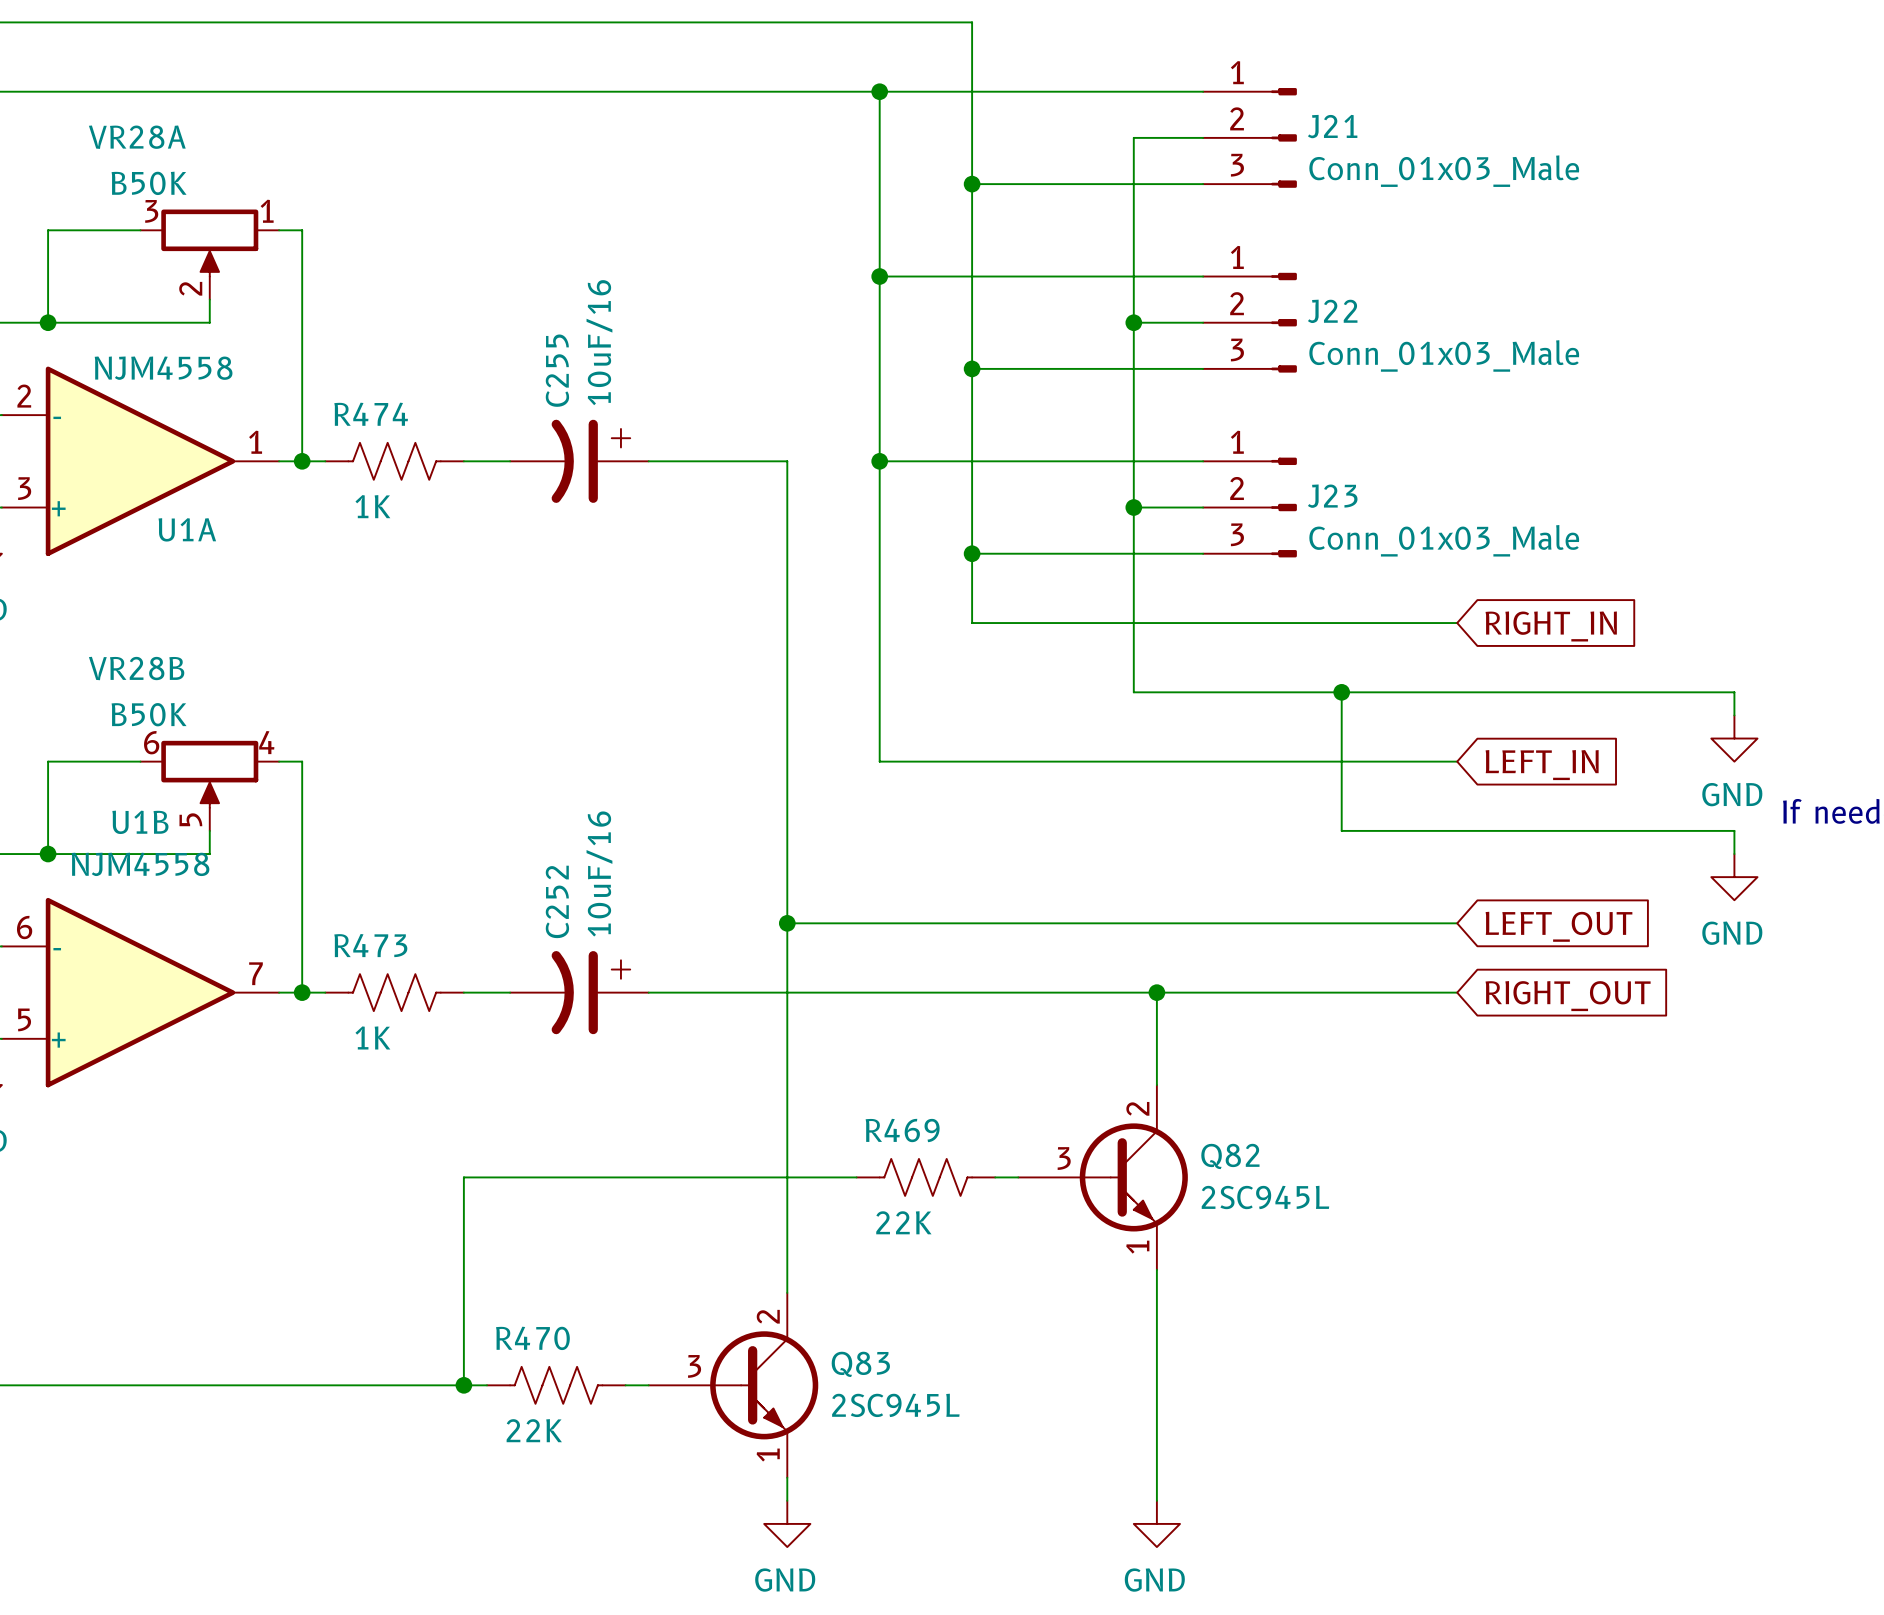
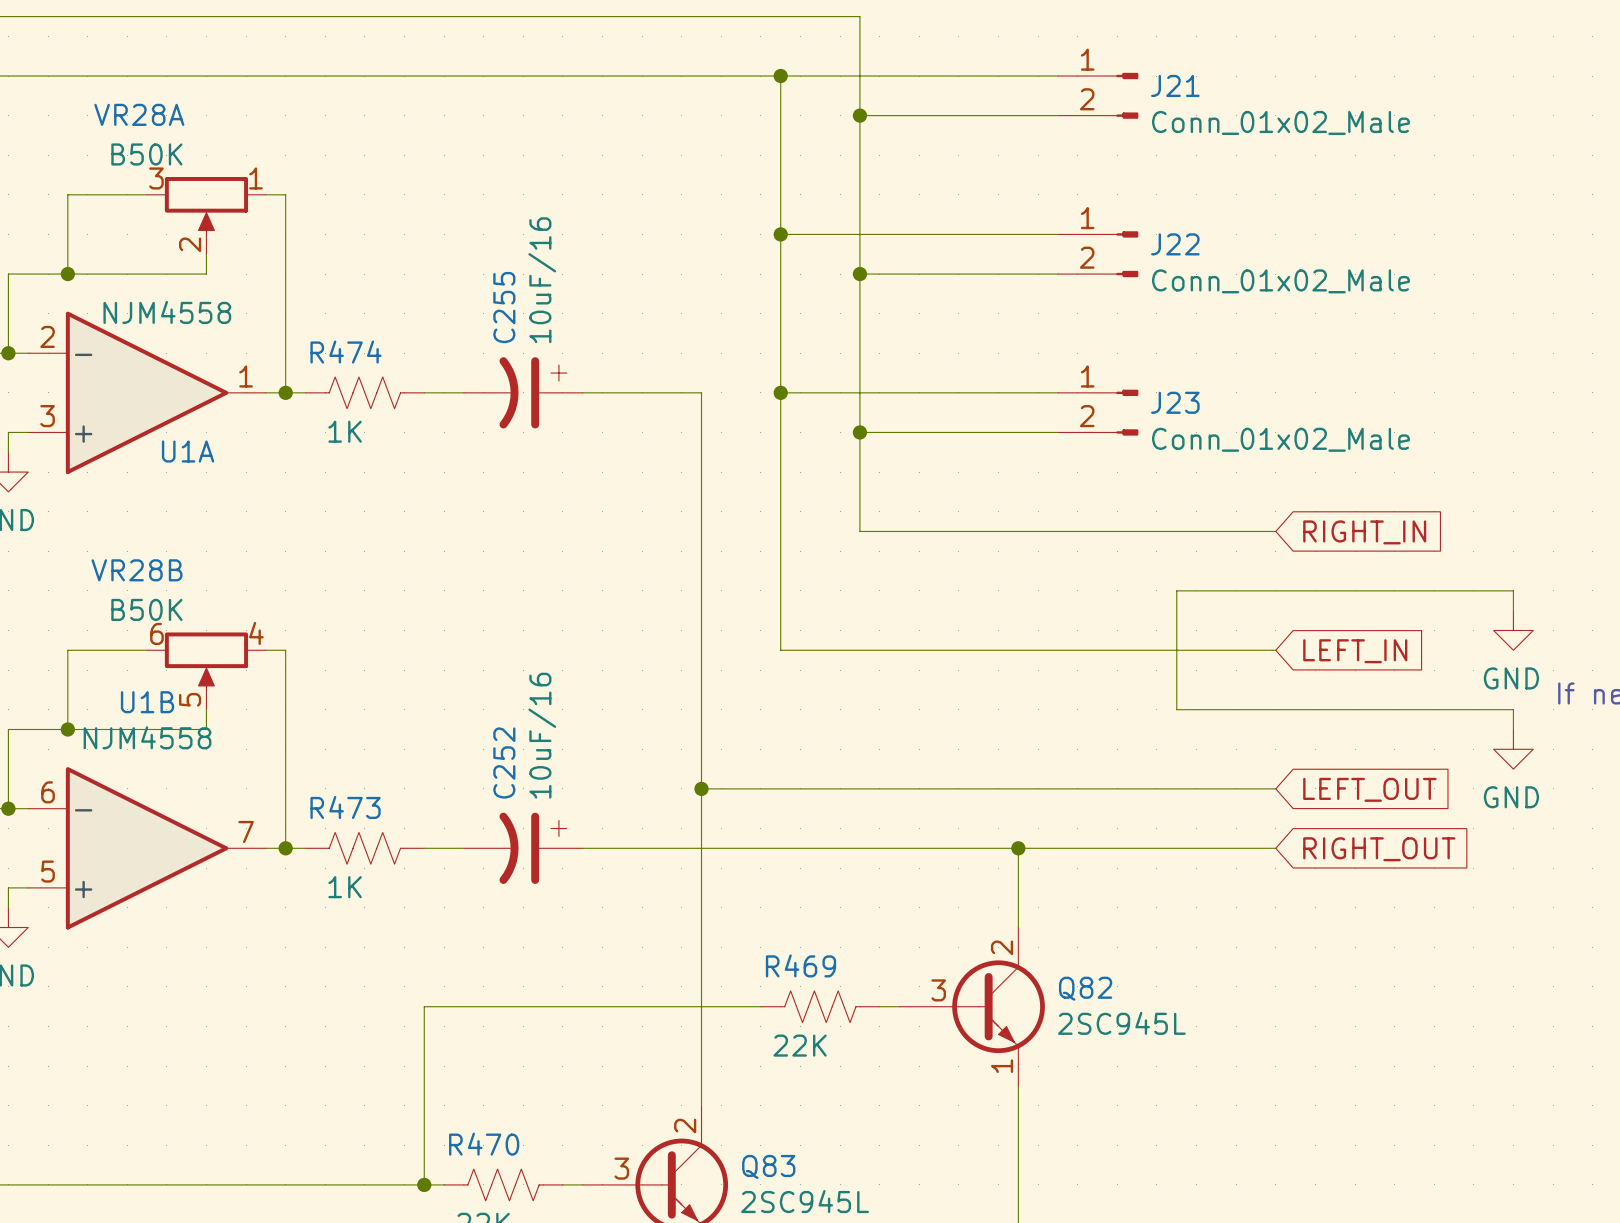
J21 symbol: [1203, 88, 1297, 188] -> [1057, 72, 1139, 119]
wire: (1133, 137) (1133, 692) (1341, 692) -> (998, 115) (859, 115)
J21 value: Conn_01x03_Male (1444, 171) -> Conn_01x02_Male (1280, 122)
wire: (972, 184) (1203, 184) -> none
junction position: (972, 184) -> (859, 115)
J22 symbol: [1203, 272, 1297, 373] -> [1057, 231, 1139, 278]
wire: none -> (859, 274) (998, 274)
junction: (1133, 322) -> none
J22 value: Conn_01x03_Male (1444, 355) -> Conn_01x02_Male (1280, 281)
wire: (972, 368) (1203, 368) -> none
junction position: (972, 368) -> (859, 274)
J23 symbol: [1203, 457, 1297, 558] -> [1057, 389, 1139, 436]
wire: none -> (859, 432) (998, 432)
junction: (1133, 507) -> none
J23 value: Conn_01x03_Male (1444, 540) -> Conn_01x02_Male (1280, 439)
wire: (972, 553) (1203, 553) -> none
junction position: (972, 553) -> (859, 432)
junction: (1341, 692) -> none

